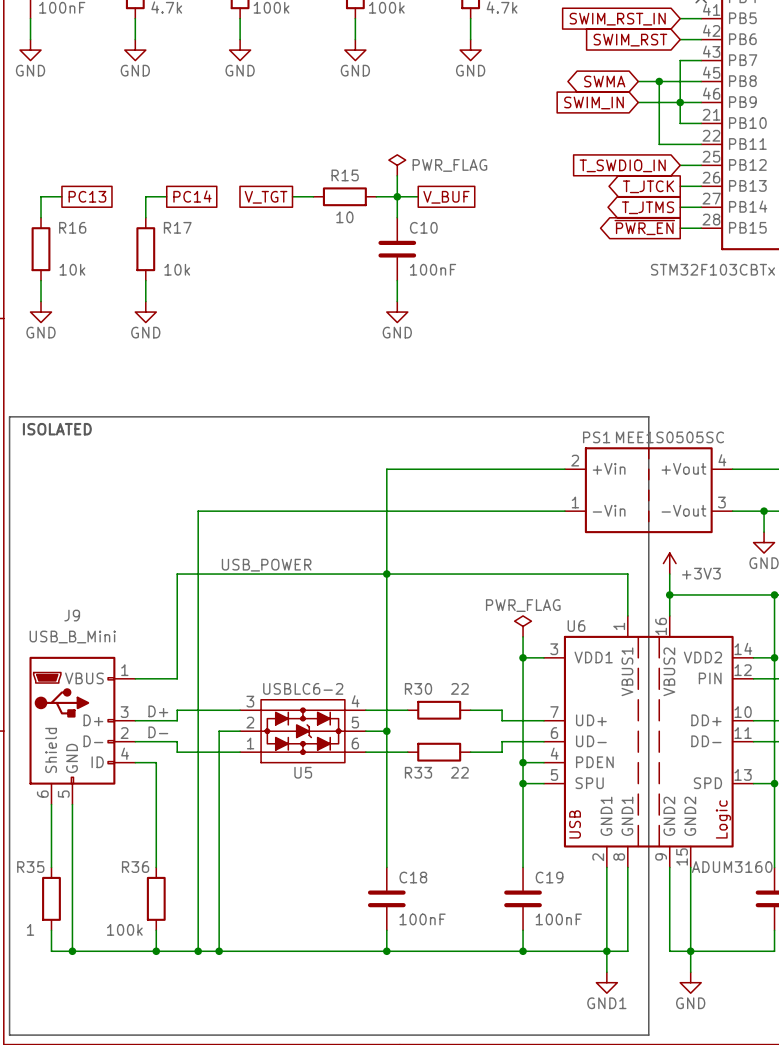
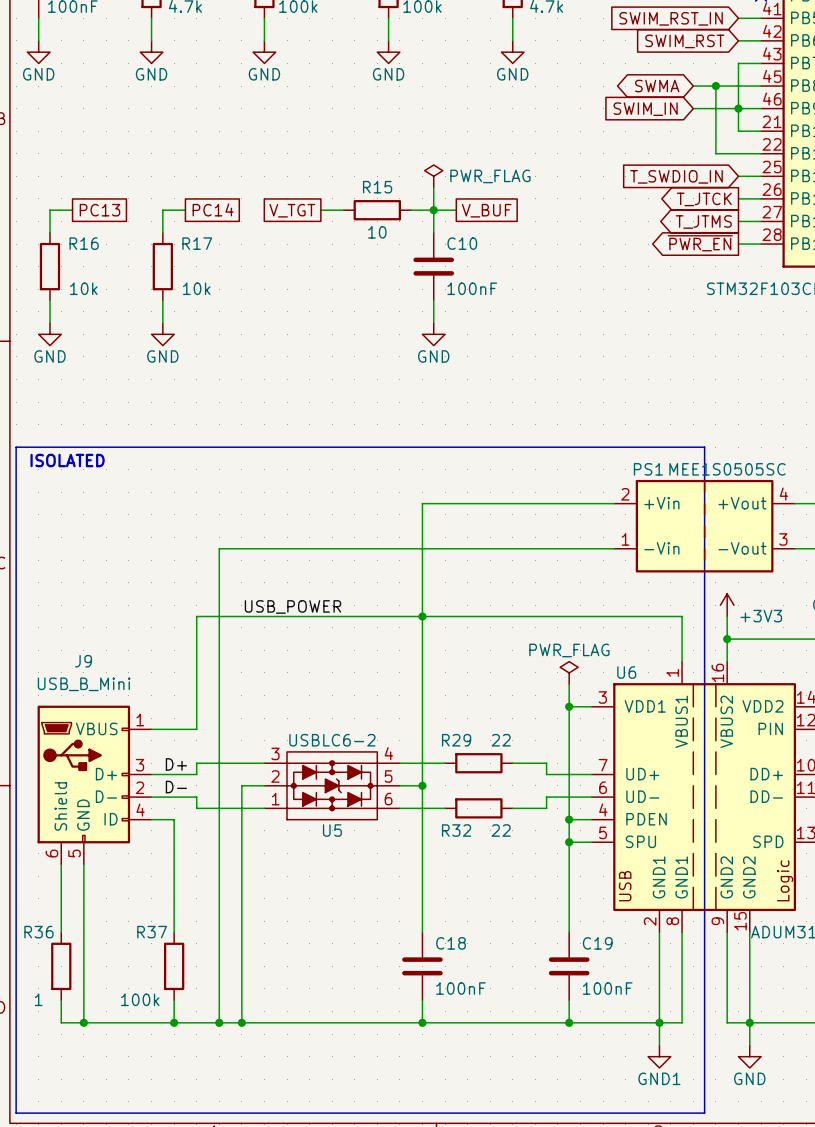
R30 name: R30 (418, 688) -> R29 (456, 740)
R33 name: R33 (418, 772) -> R32 (456, 830)
R35 name: R35 (30, 867) -> R36 (38, 932)
R36 name: R36 (135, 867) -> R37 (152, 932)

